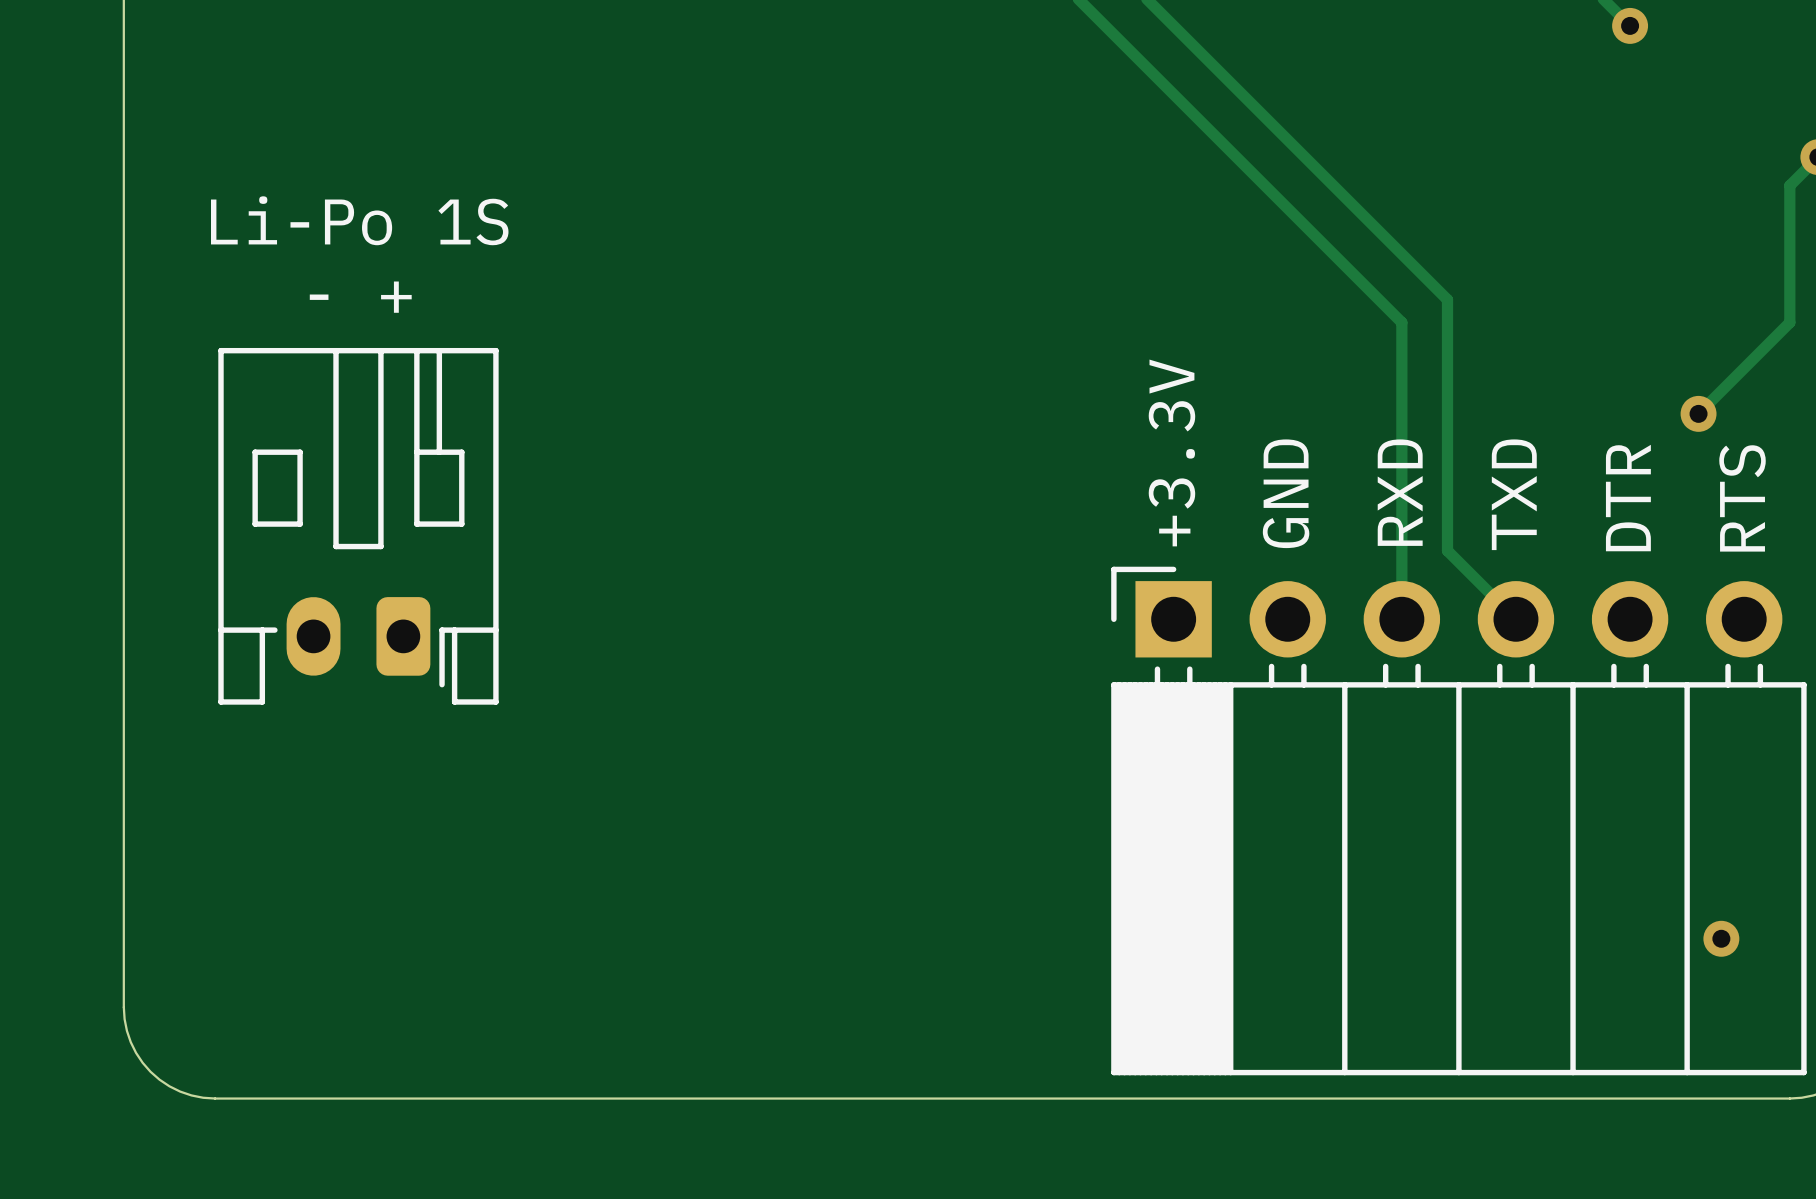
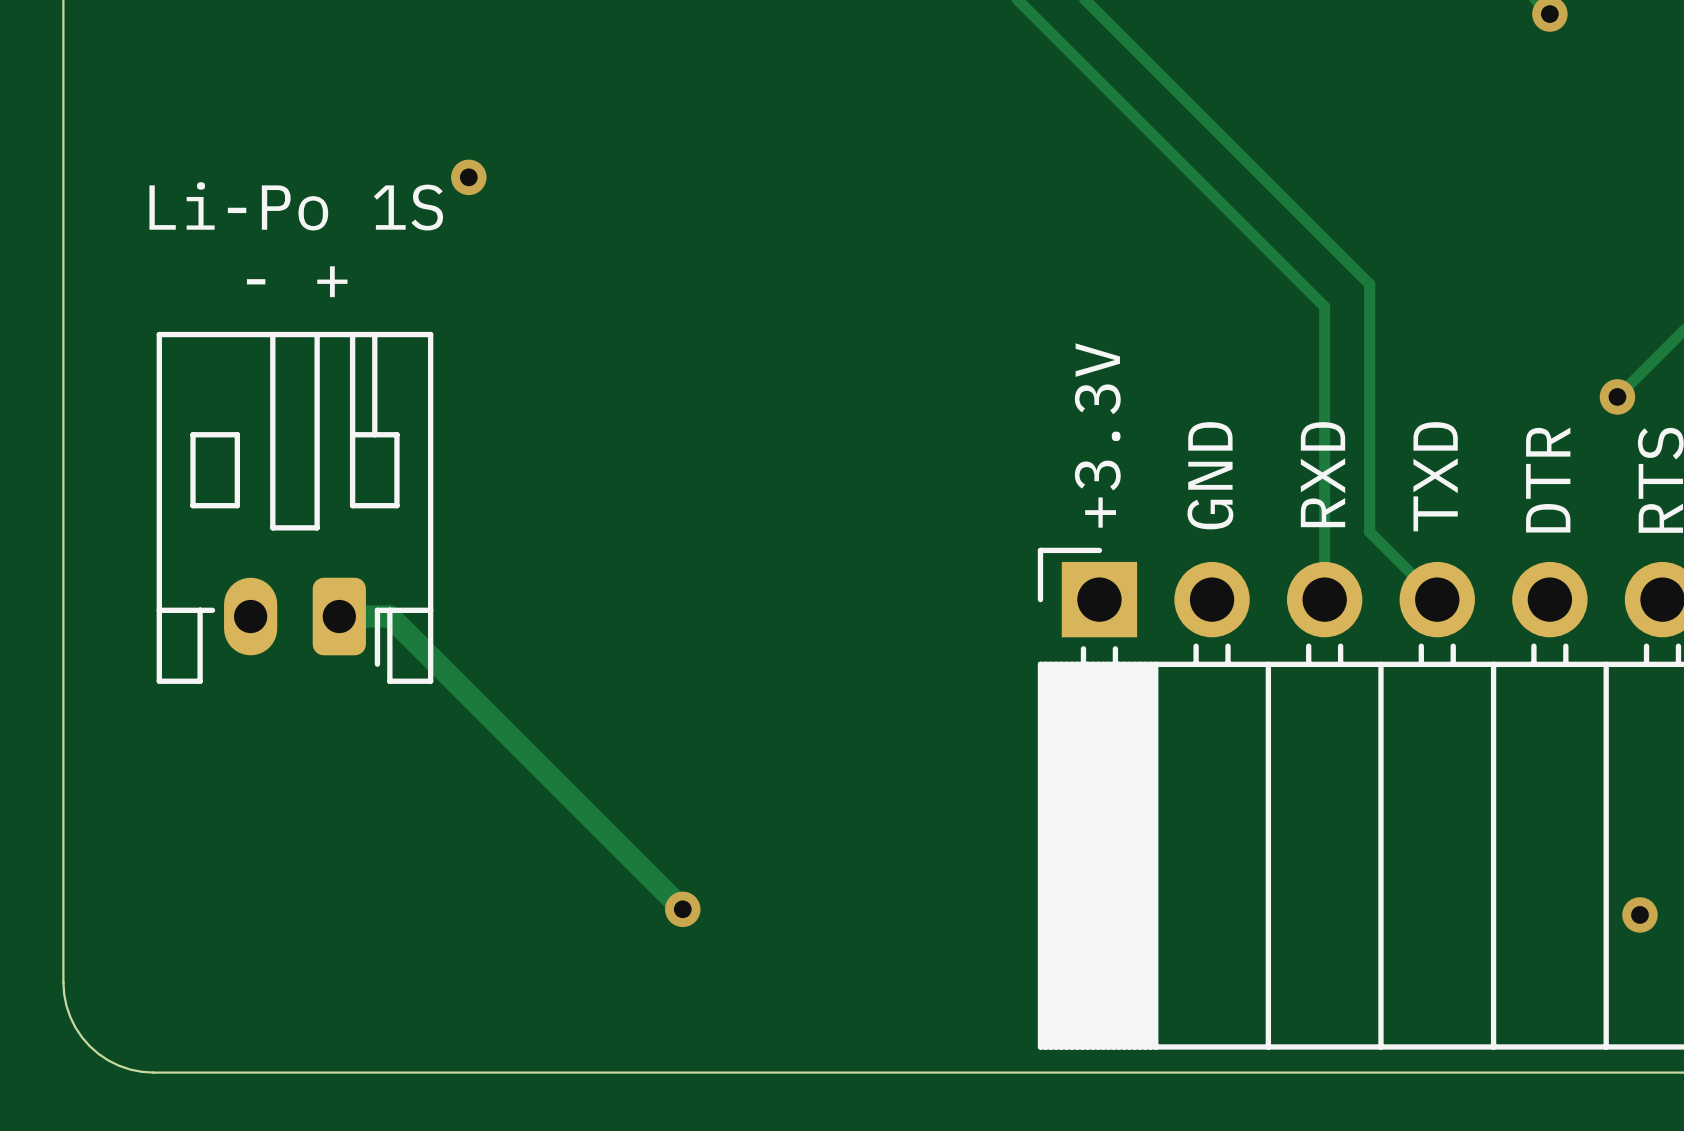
via: none -> (468, 177)
track: none -> (339, 616) (389, 616) (682, 909)
via: none -> (682, 909)

